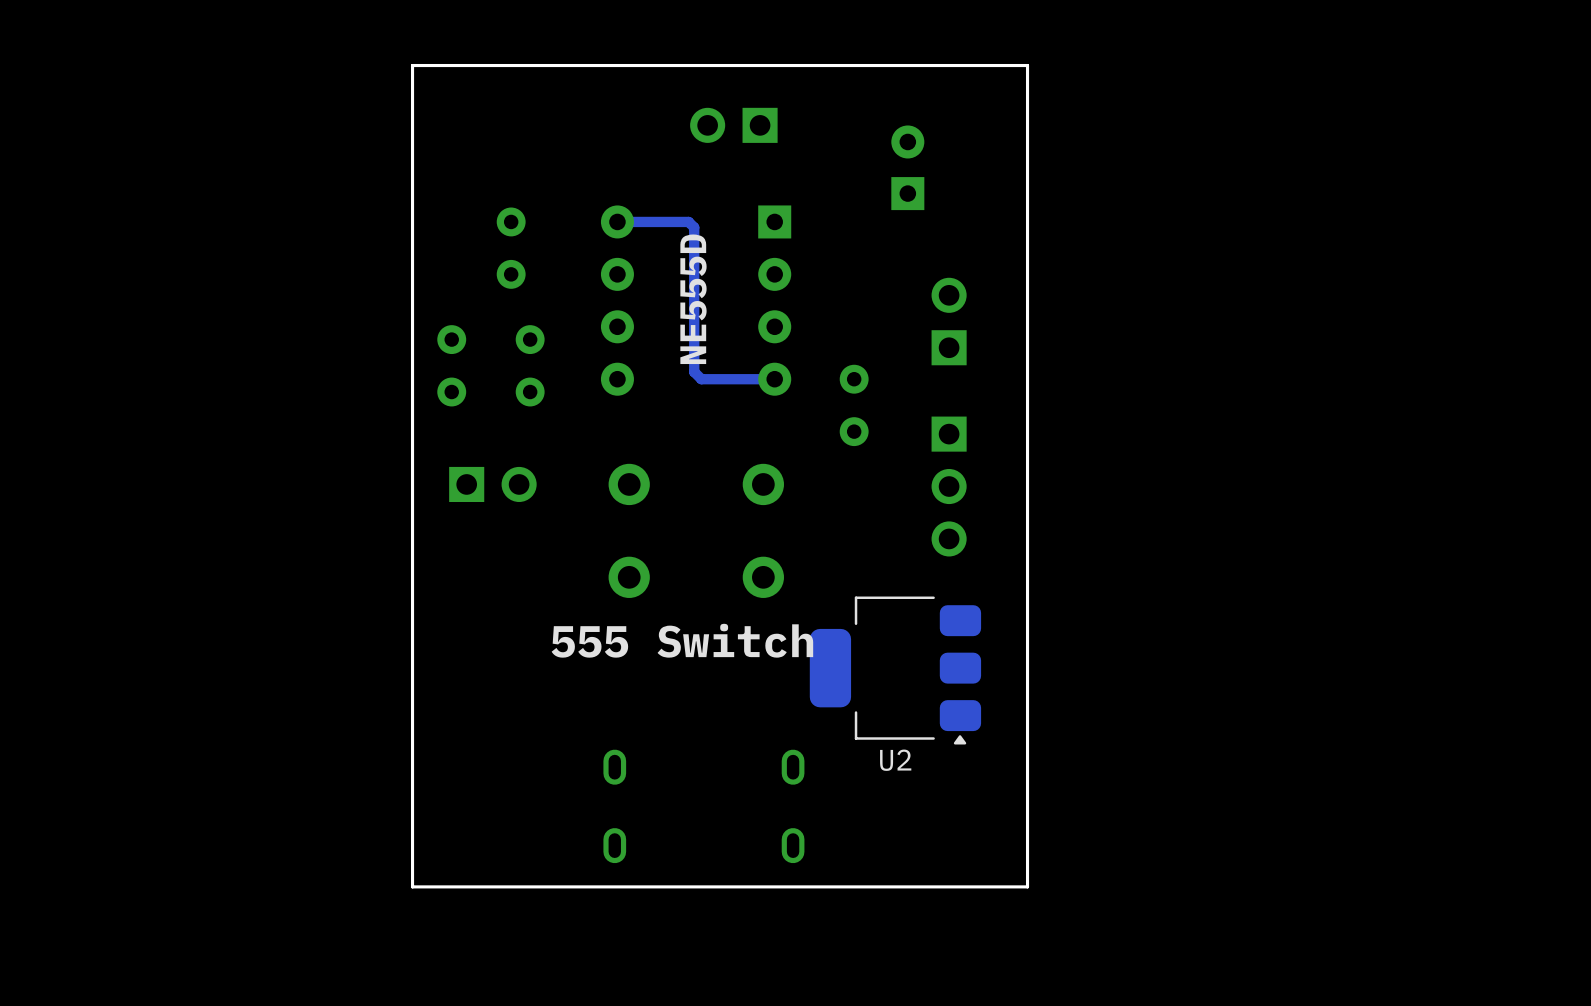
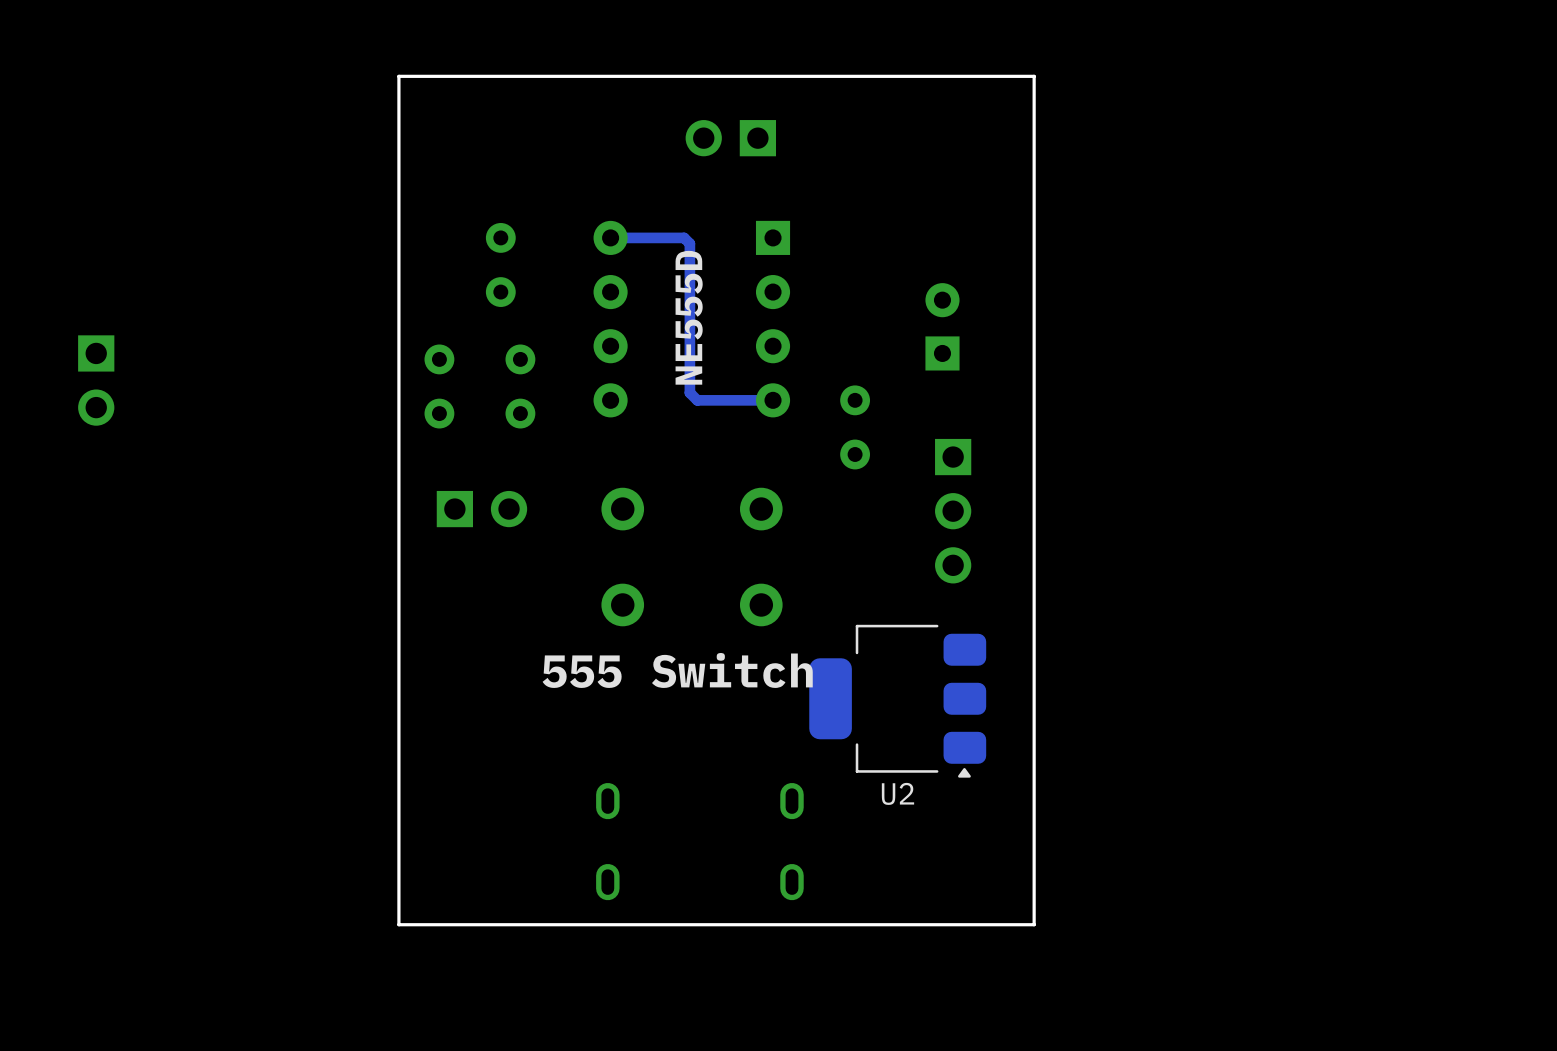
part: (907, 167) -> none
part footprint: [931, 277, 967, 366] -> [925, 283, 960, 371]
part: none -> (96, 380)

